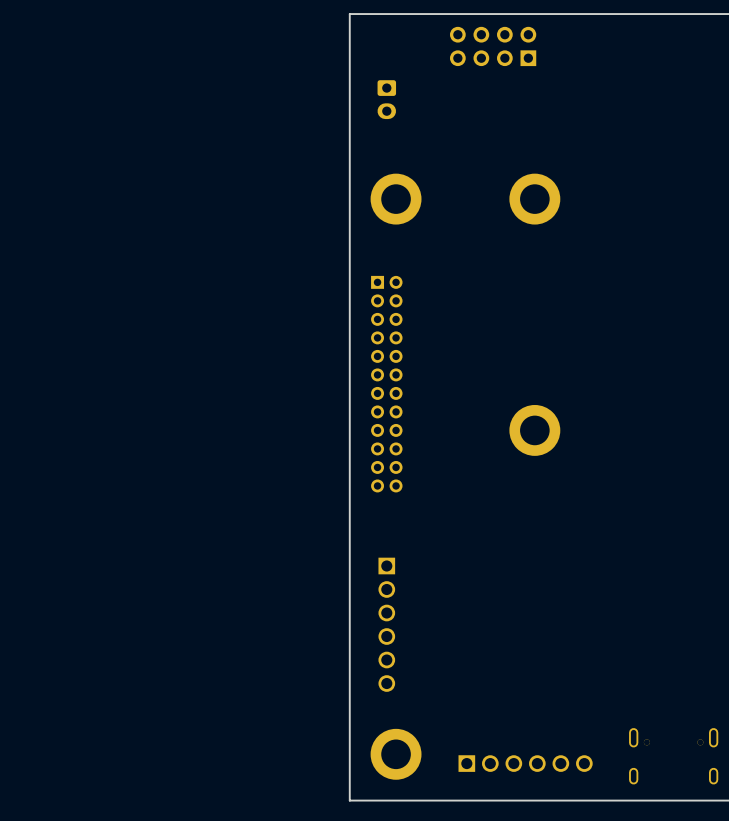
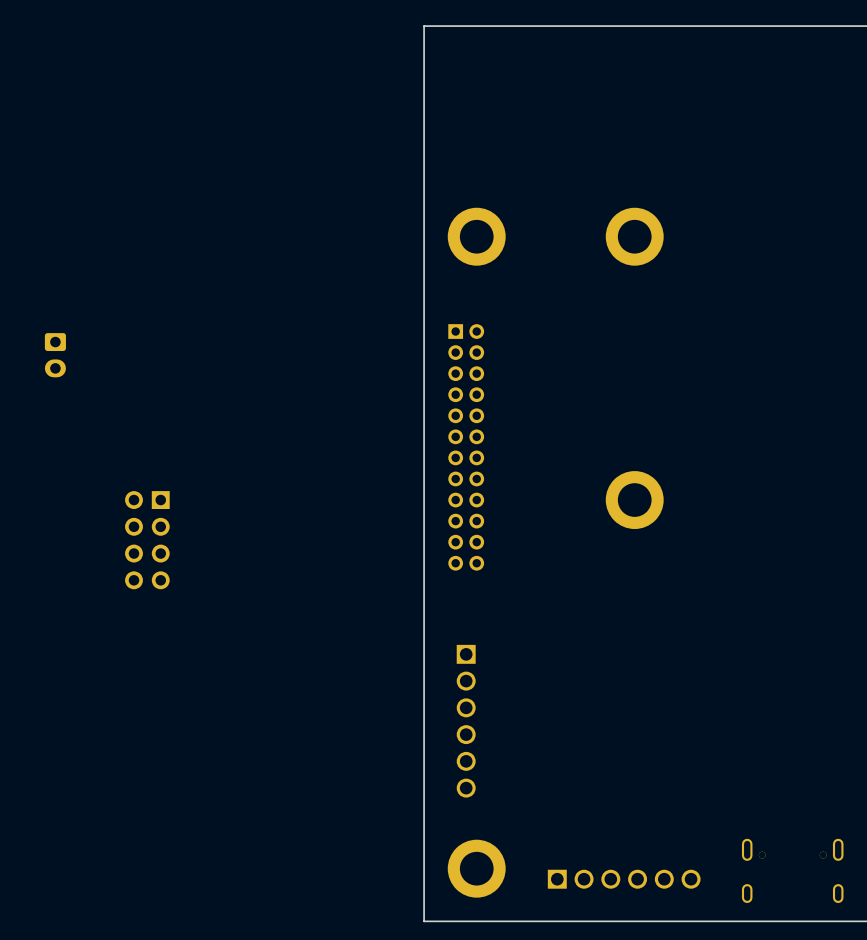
part: (493, 46) -> none
part: (386, 99) -> none
part: none -> (55, 355)
part: none -> (147, 540)

